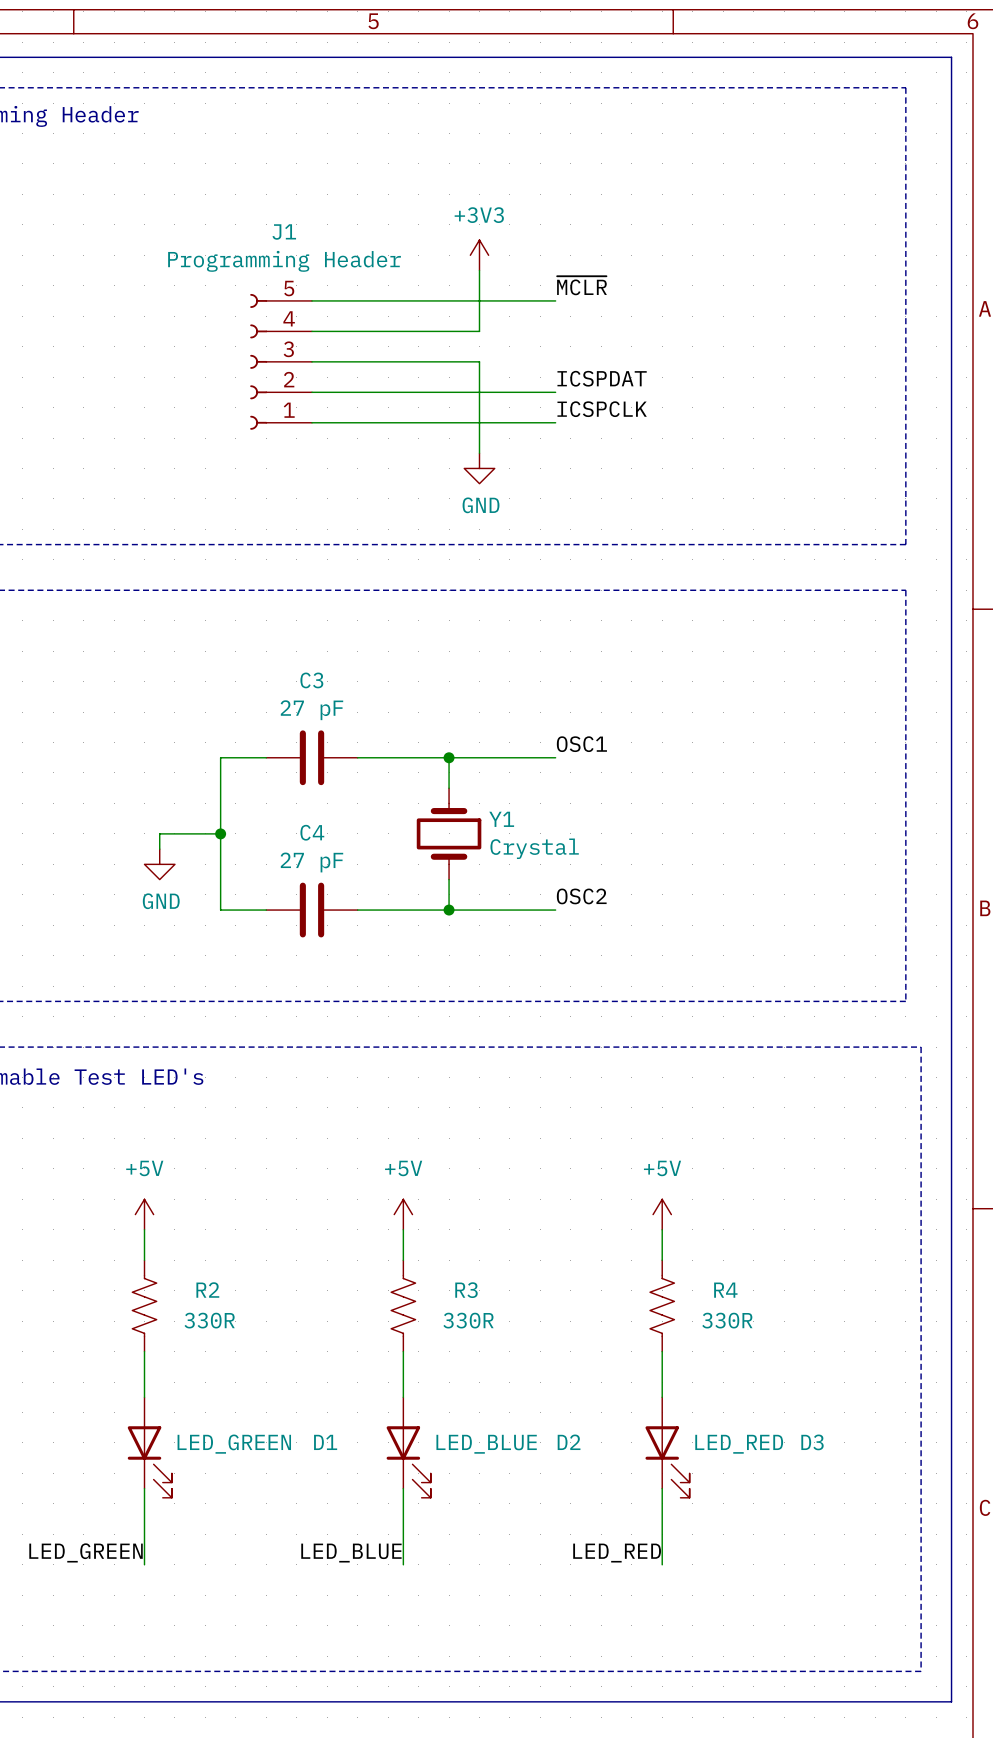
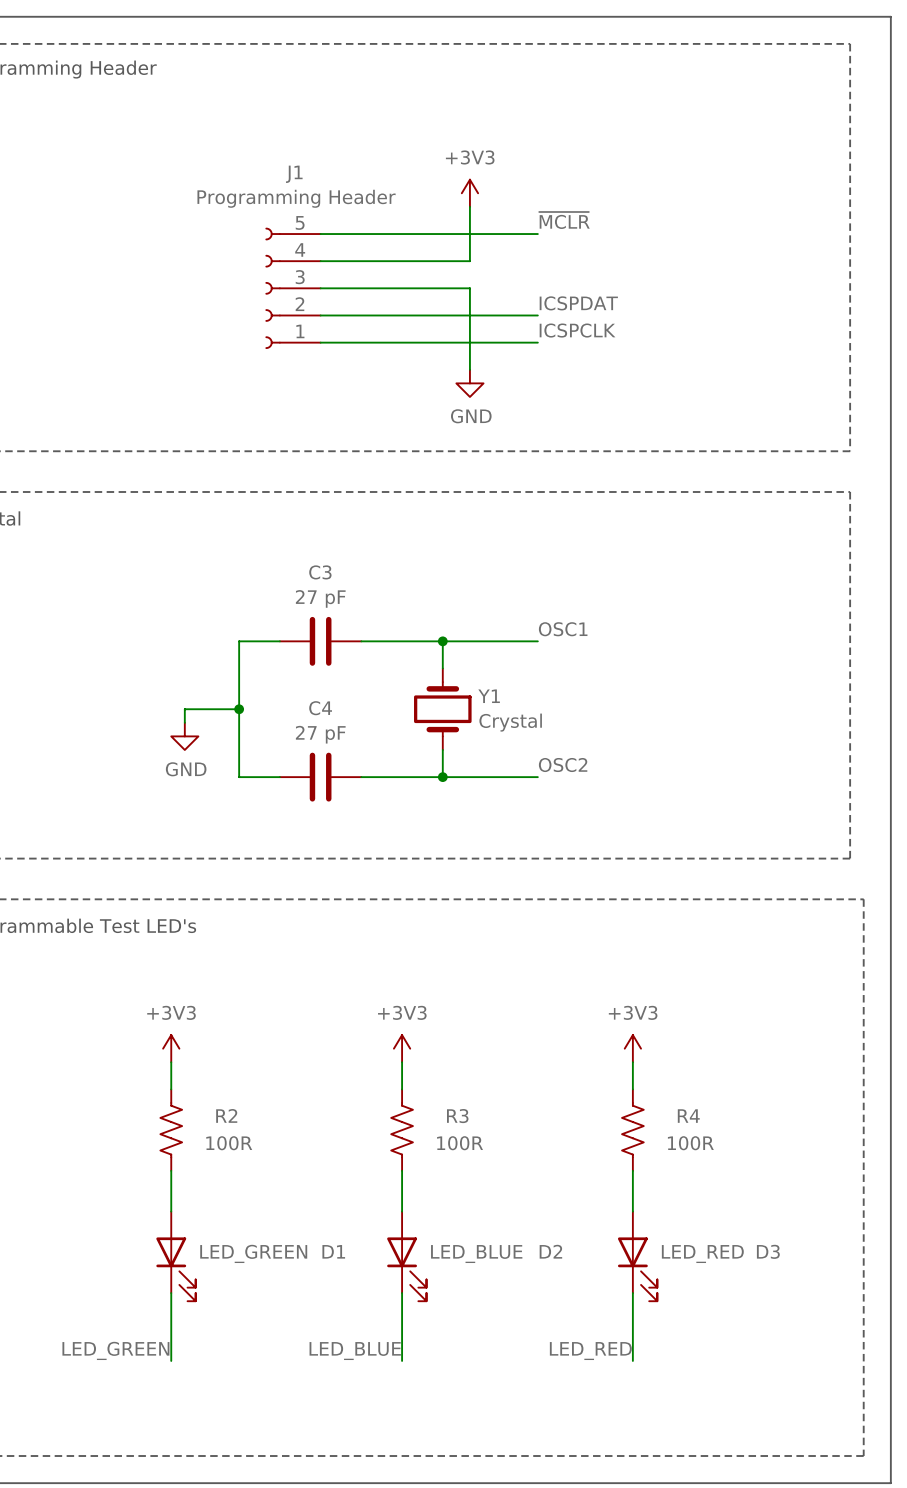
power symbol: +5V (144, 1214) -> +3V3 (171, 1048)
power symbol: +5V (403, 1214) -> +3V3 (402, 1048)
power symbol: +5V (662, 1214) -> +3V3 (632, 1048)
R2 value: 330R (209, 1320) -> 100R (229, 1143)
R3 value: 330R (468, 1320) -> 100R (460, 1143)
R4 value: 330R (727, 1320) -> 100R (690, 1143)

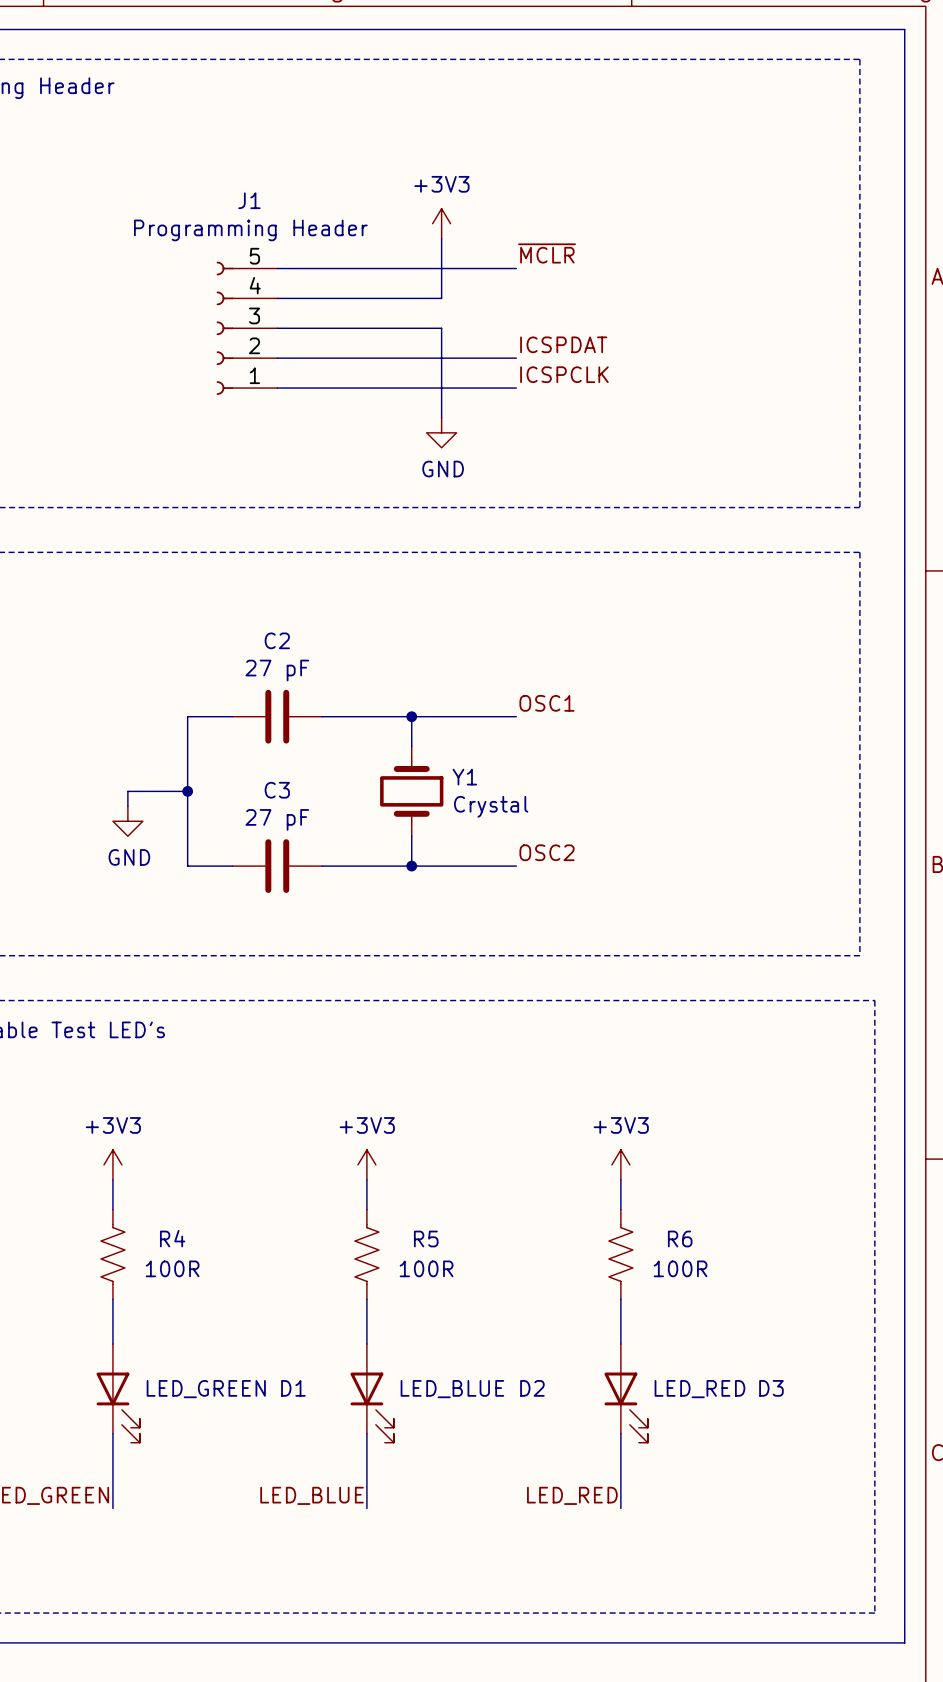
C3 name: C3 (320, 572) -> C2 (277, 640)
C4 name: C4 (320, 708) -> C3 (277, 790)
R2 name: R2 (226, 1115) -> R4 (172, 1238)
R3 name: R3 (457, 1116) -> R5 (426, 1239)
R4 name: R4 (688, 1116) -> R6 (680, 1239)

